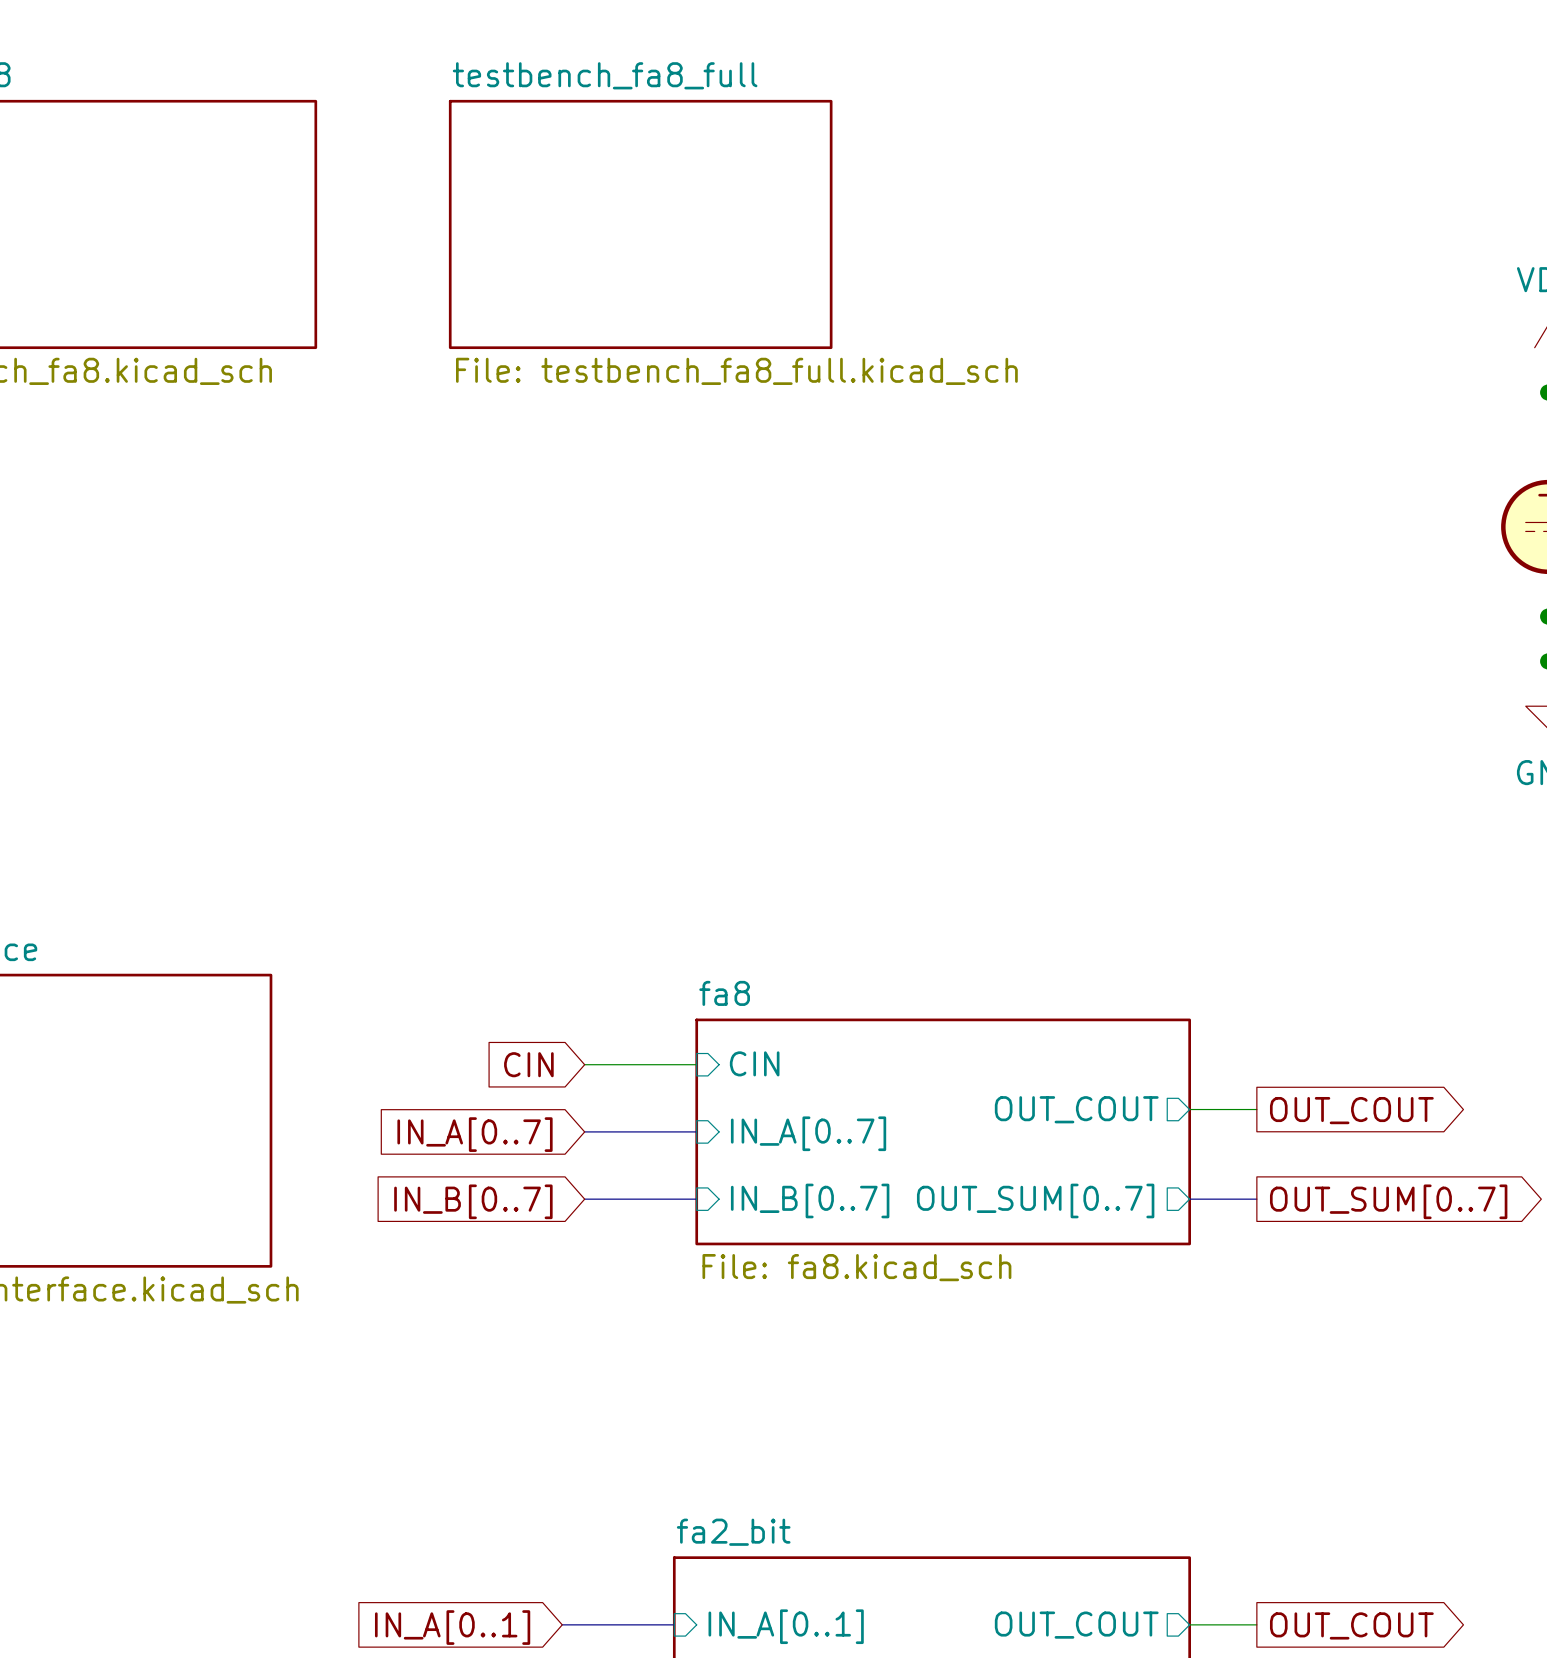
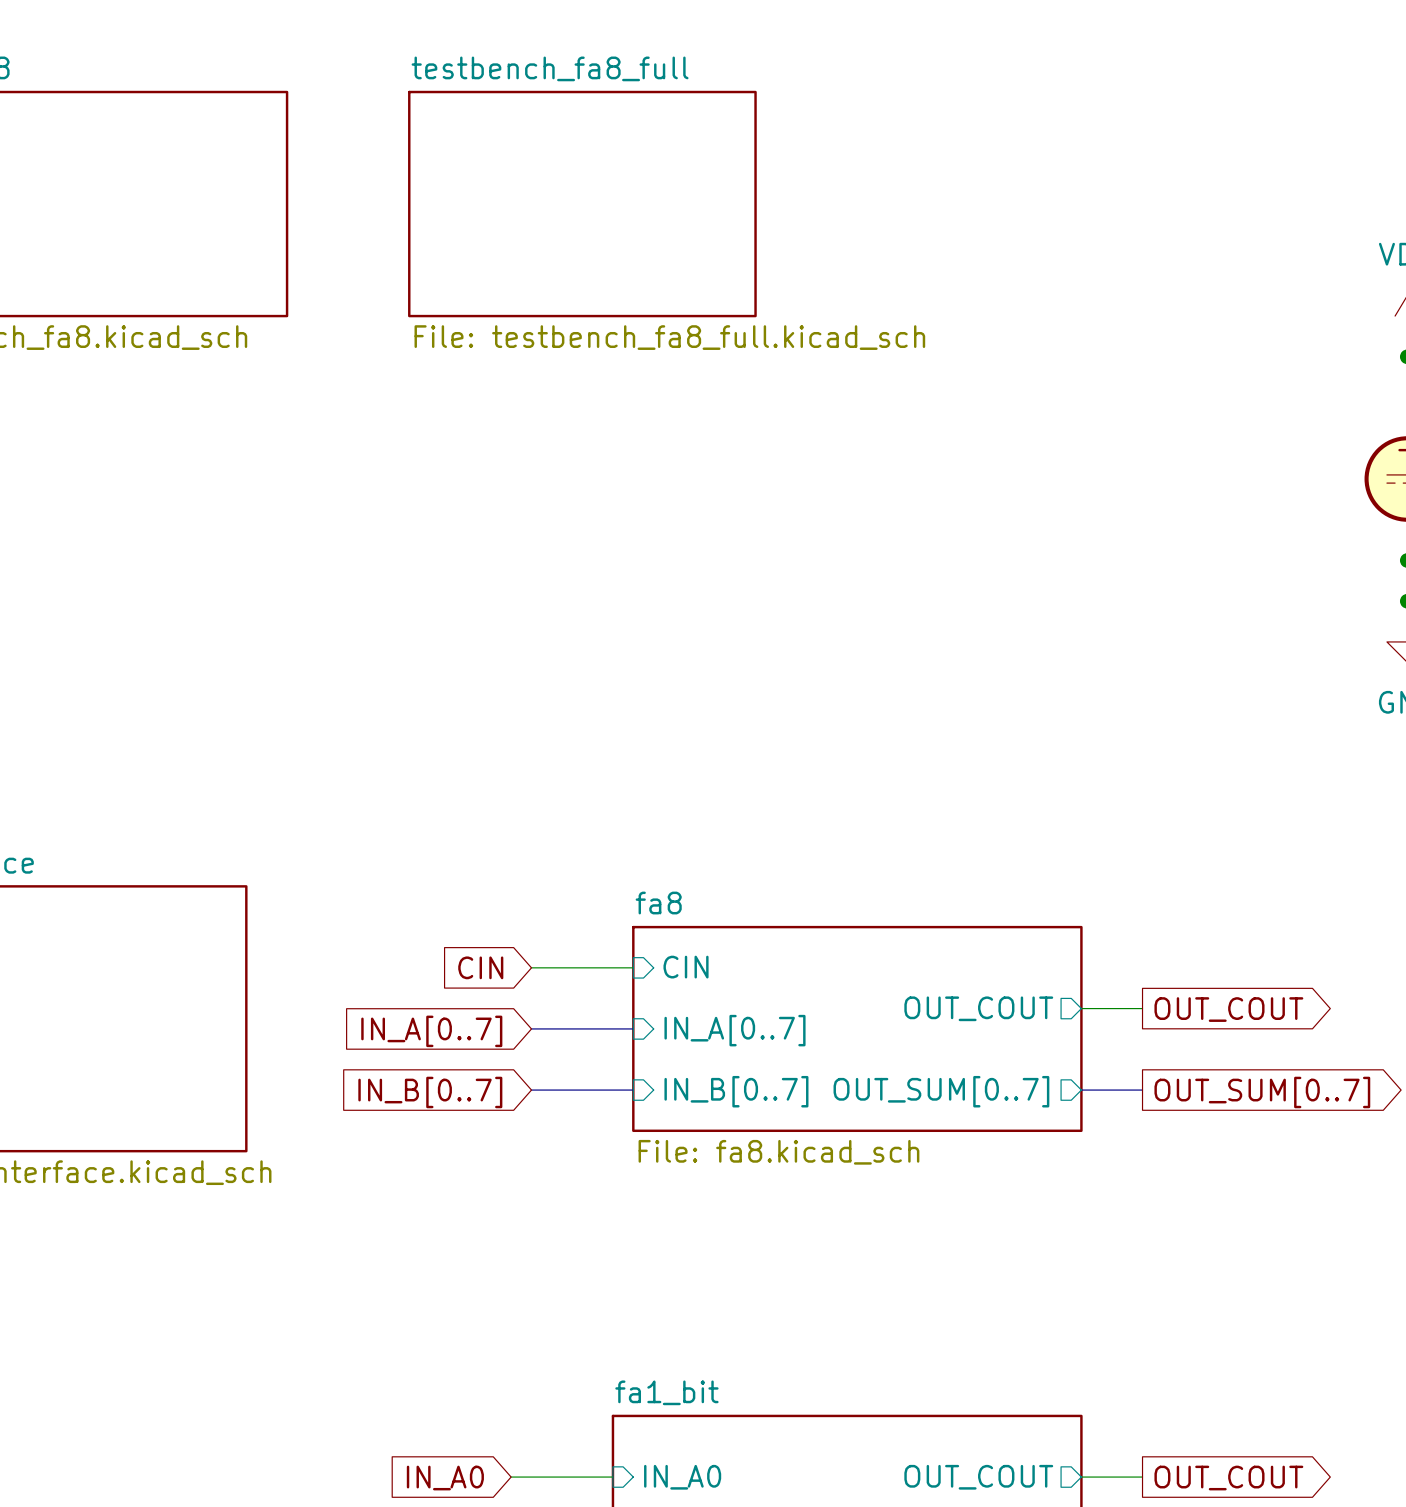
sheet fa2_bit name: fa2_bit (733, 1532) -> fa1_bit (666, 1392)
bus: (562, 1624) (674, 1624) -> none
sheet pin: IN_A[0..1] (786, 1626) -> IN_A0 (682, 1477)
global label: IN_A[0..1] (452, 1627) -> IN_A0 (445, 1478)

